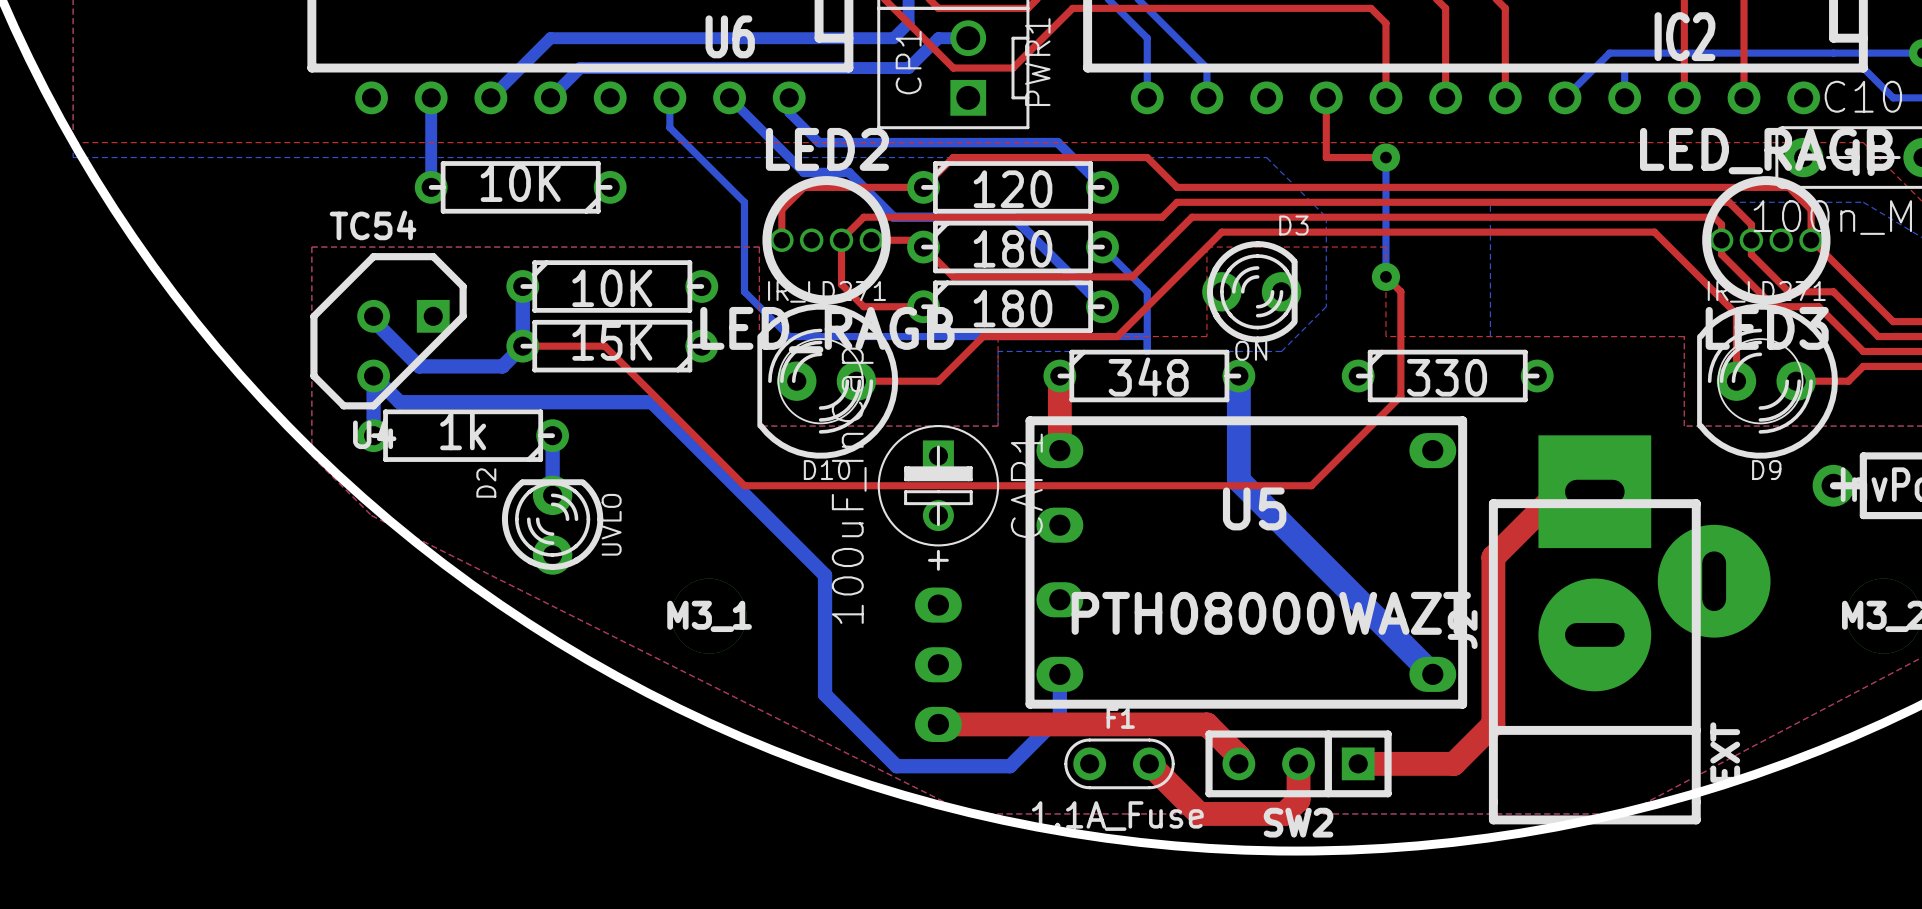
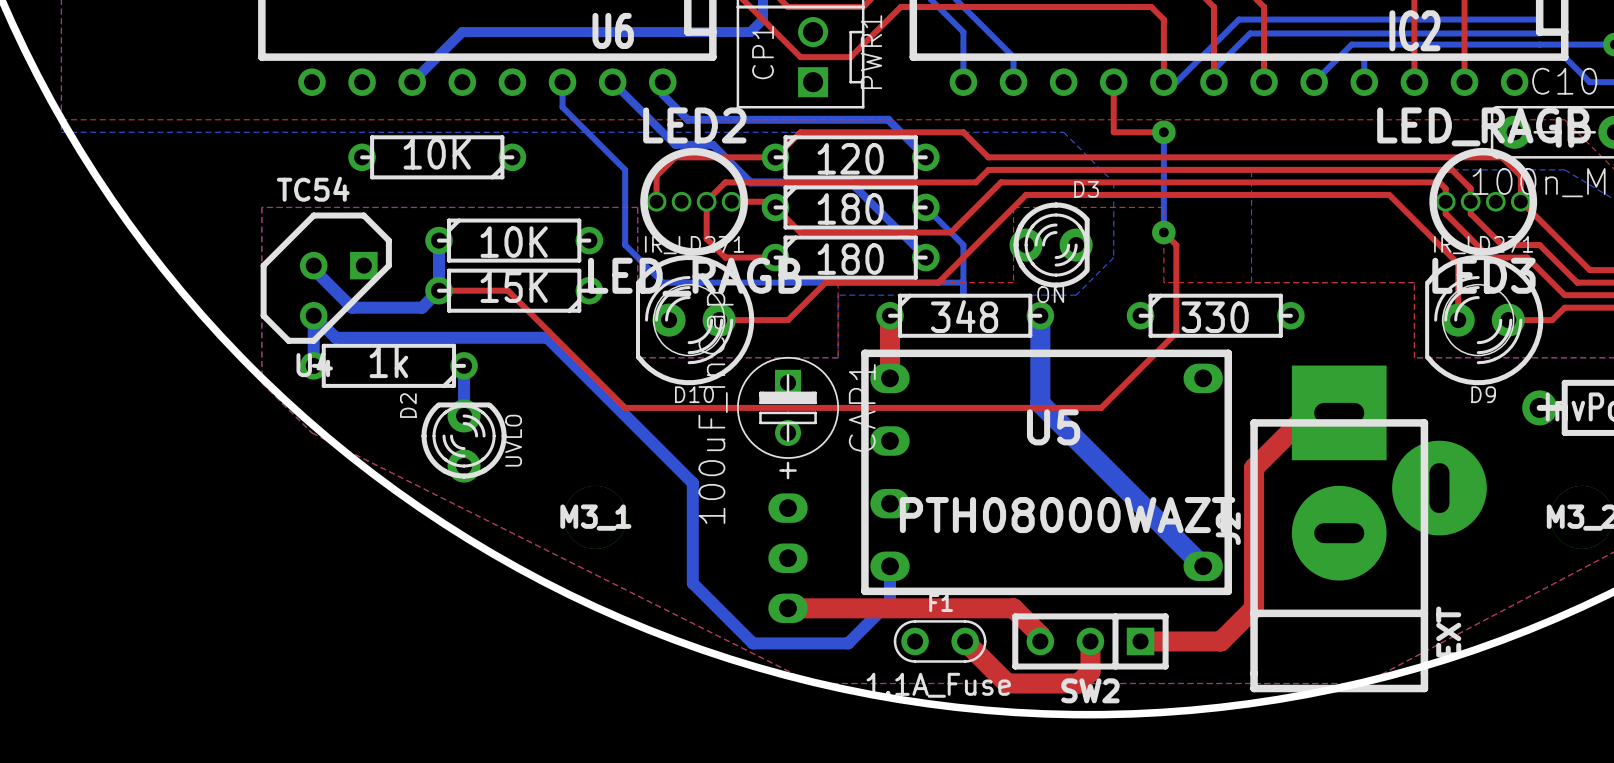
bottom track: none -> (1539, 19) (1239, 19) (1176, 82) (1163, 82)
bottom track: (968, 38) (938, 38) (908, 68) (580, 68) (550, 97) -> none
bottom track: none -> (1539, 33) (1250, 33) (1213, 69) (1213, 82)
bottom track: (431, 97) (431, 187) -> none

